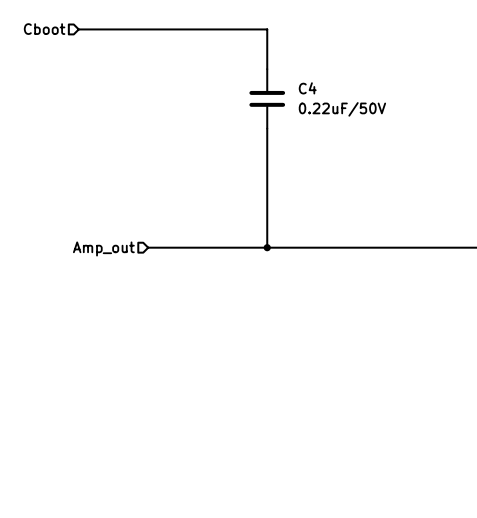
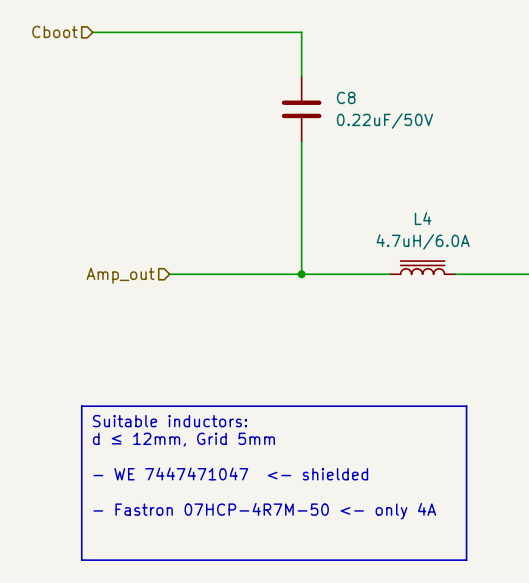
C4 name: C4 (307, 88) -> C8 (346, 97)
L4: none -> 4.7uH/6.0A (422, 267)
wire: (346, 247) (406, 247) -> none
line: none -> (81, 406) (466, 406) (466, 560) (81, 560) (81, 406)
text: none -> Suitable inductors: (170, 421)
text: none -> d ≤ 12mm, Grid 5mm (183, 439)
text: none -> - WE 7447471047 <- shielded (230, 473)
text: none -> - Fastron 07HCP-4R7M-50 <- only 4A (264, 511)

